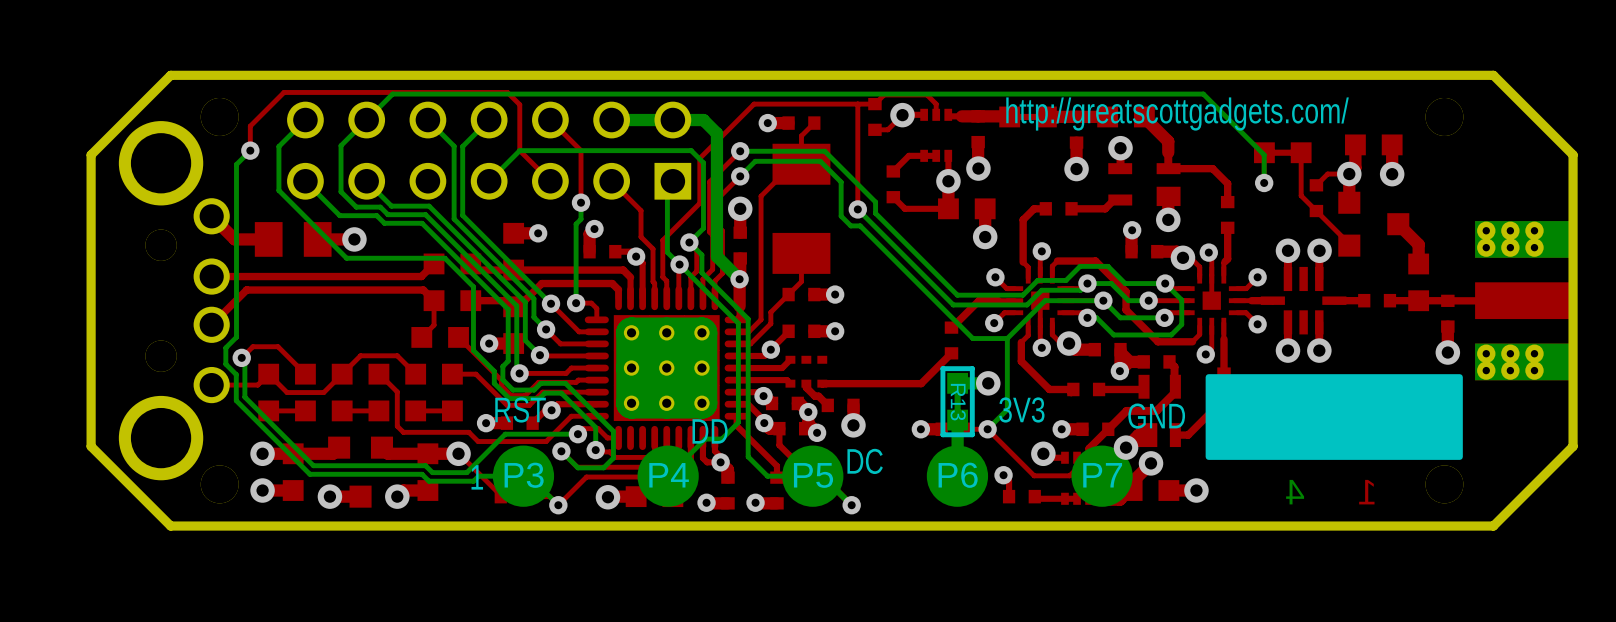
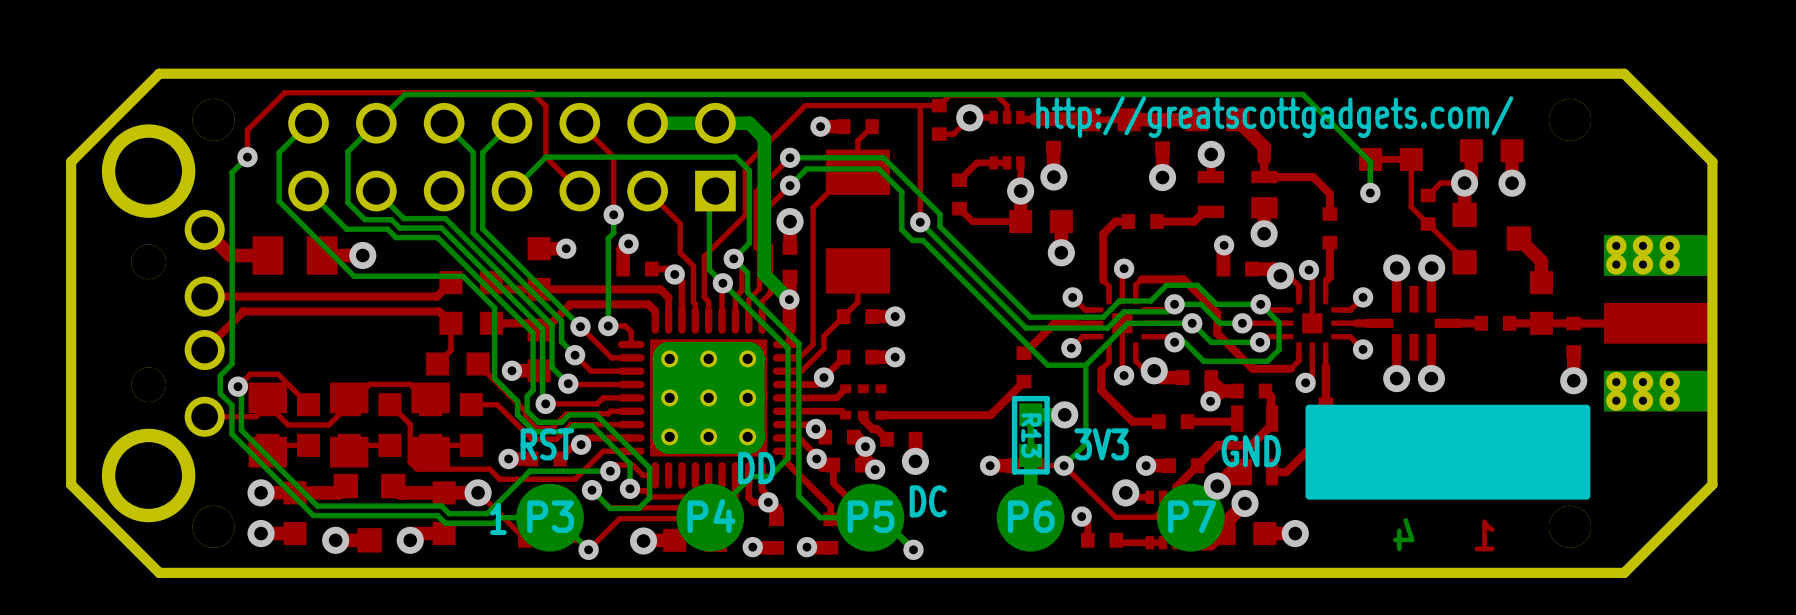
part footprint: [258, 363, 280, 422] -> [248, 382, 288, 468]
part footprint: [331, 363, 353, 422] -> [329, 382, 369, 468]
part footprint: [405, 363, 427, 422] -> [411, 382, 450, 468]

